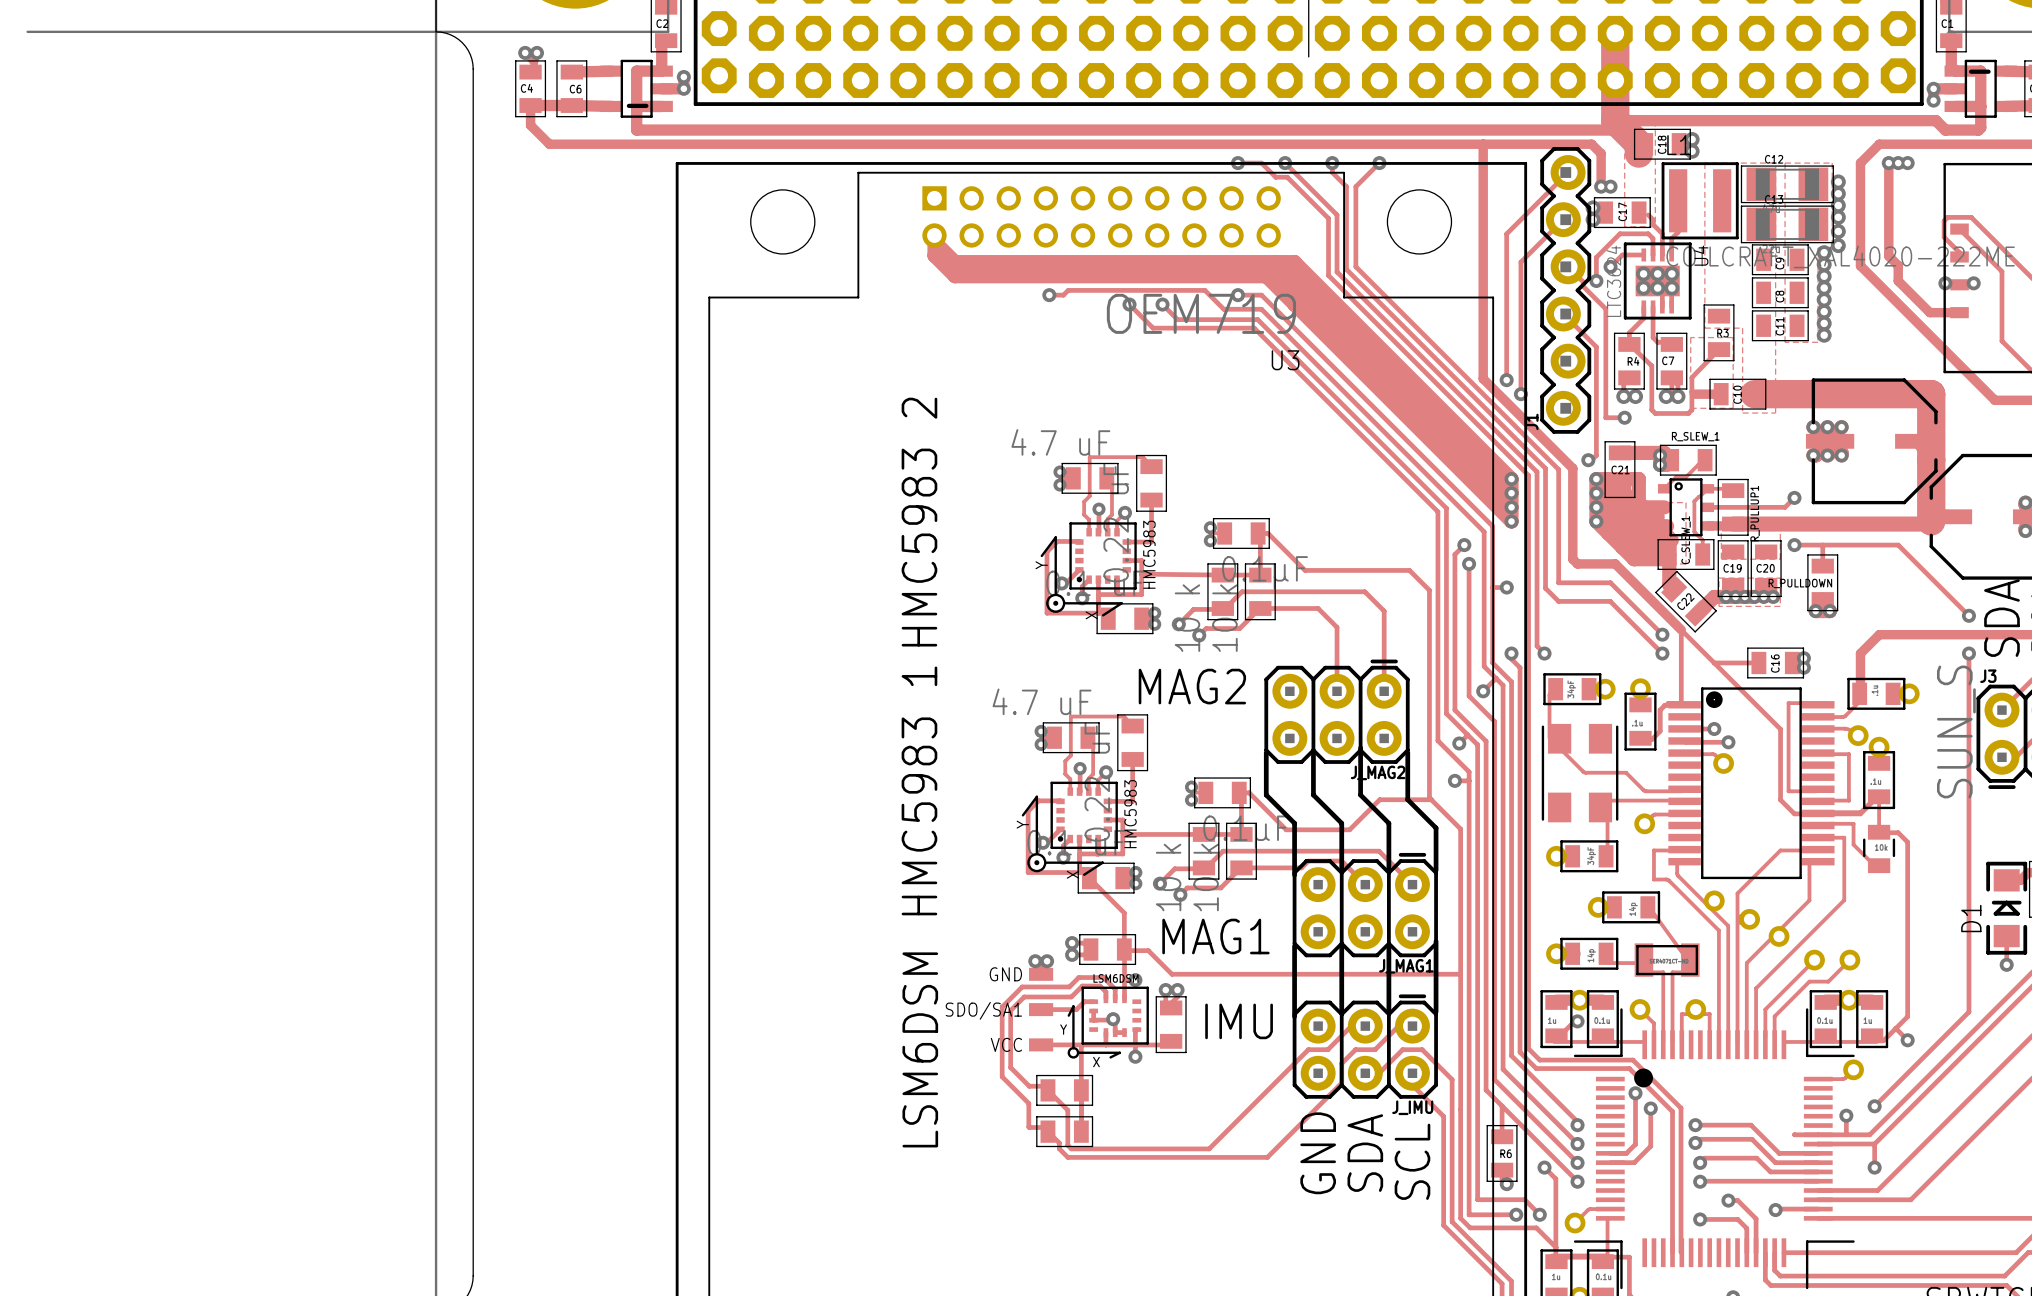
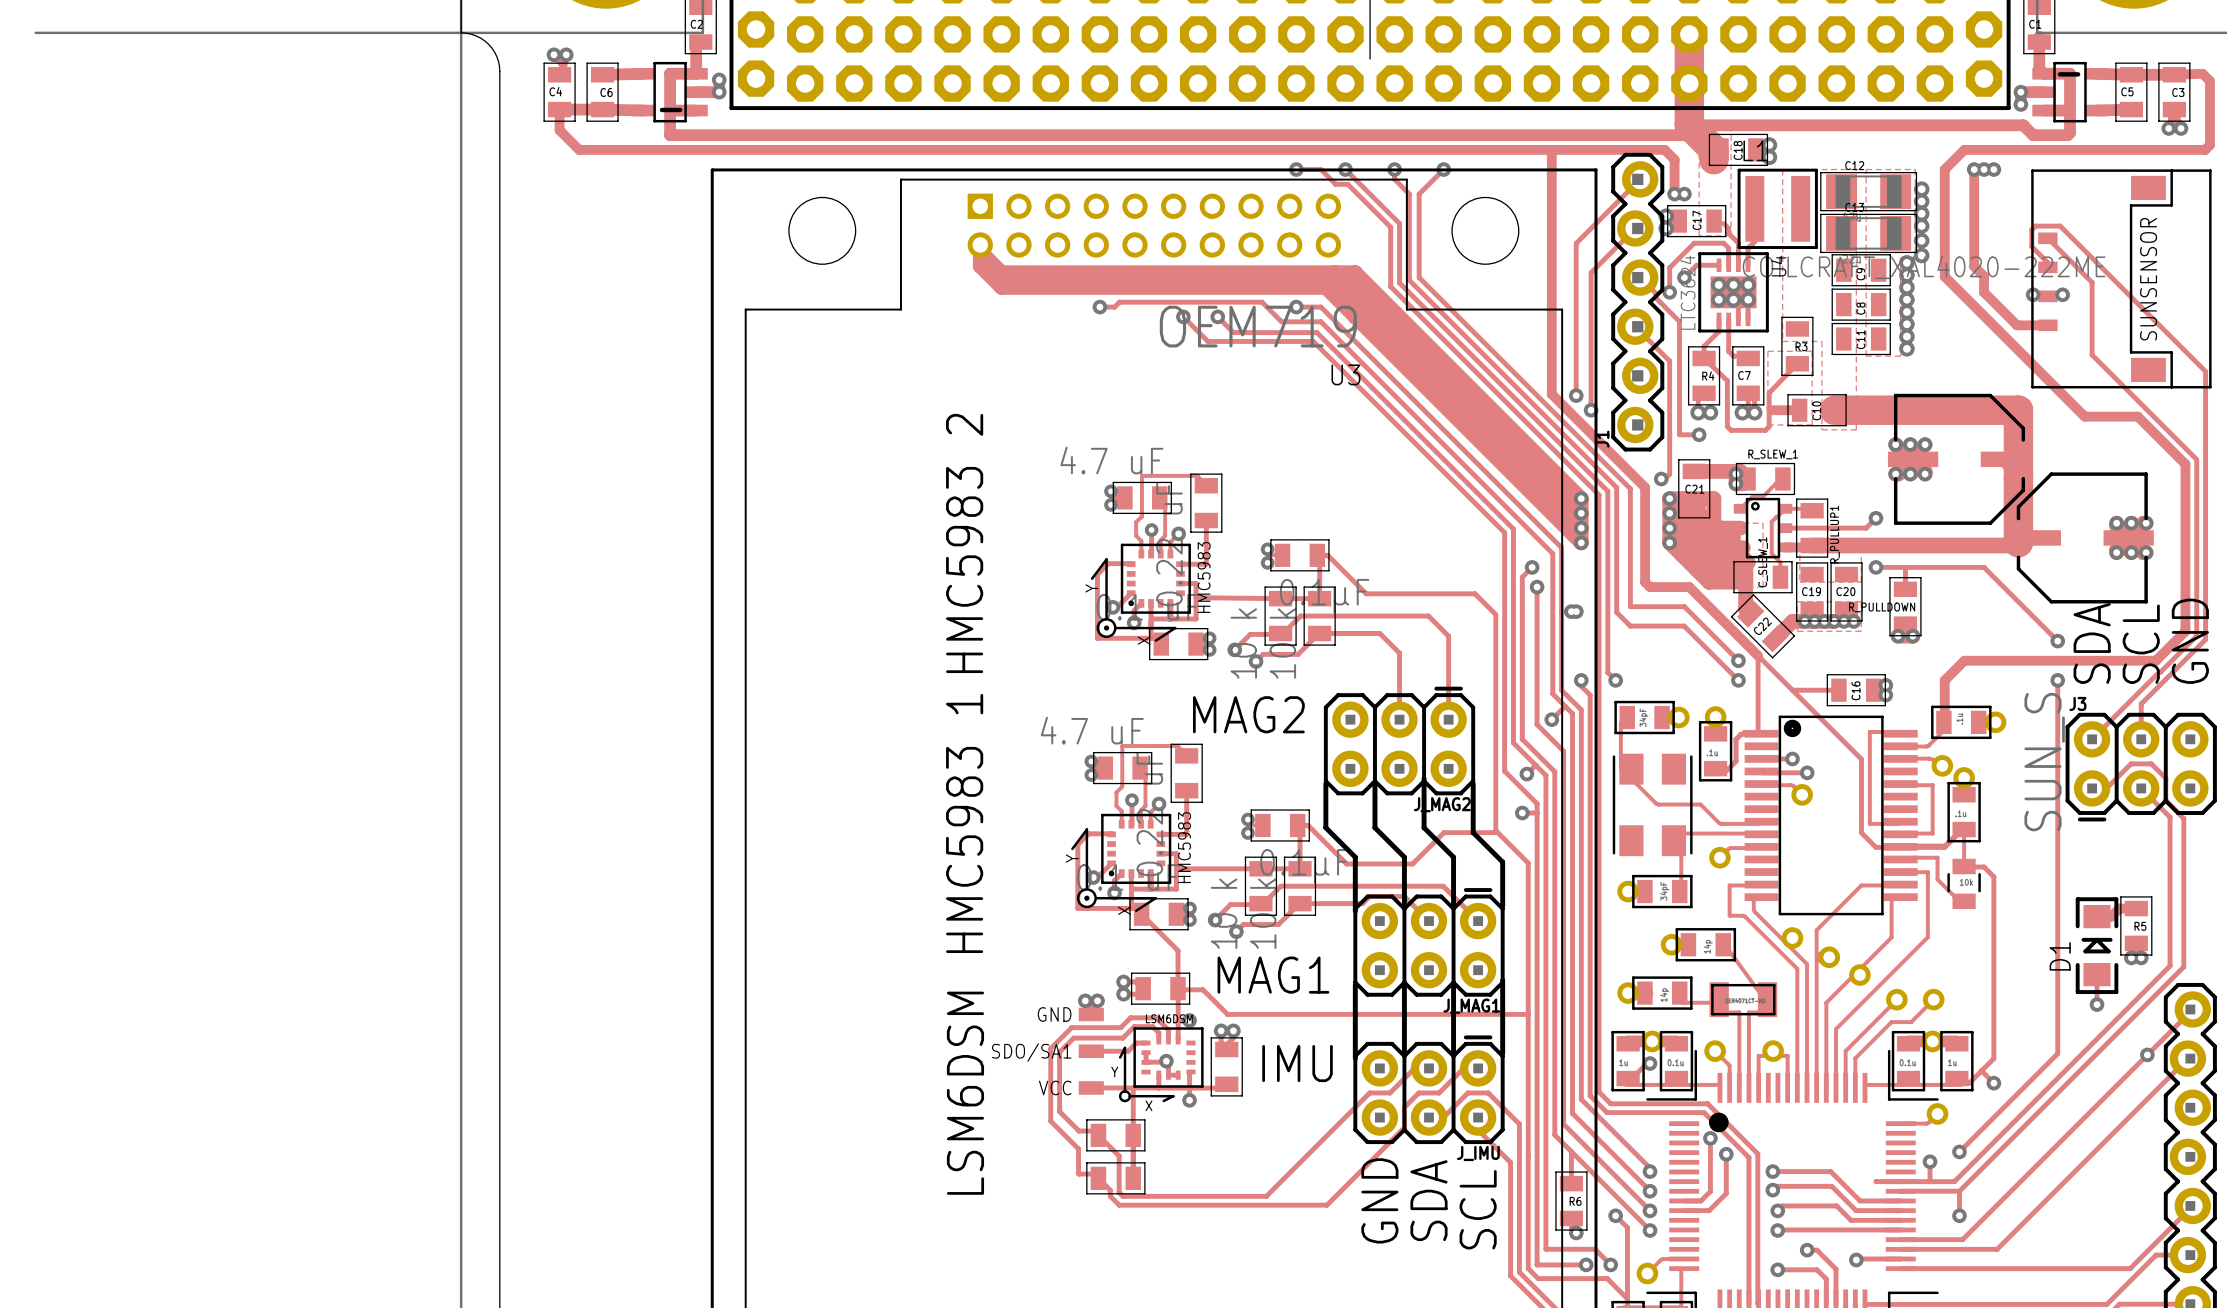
via: none -> (1571, 611)

